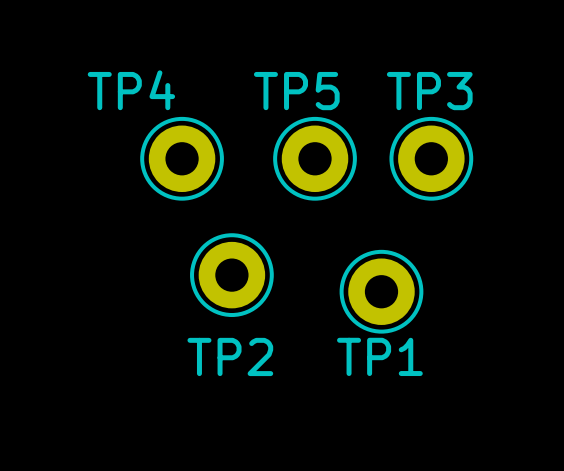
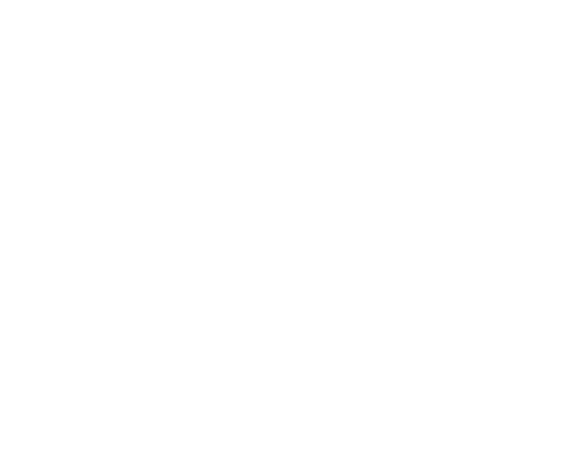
TP4: (182, 158) -> none
TP5: (315, 158) -> none
TP3: (431, 158) -> none
TP2: (231, 275) -> none
TP1: (381, 291) -> none

